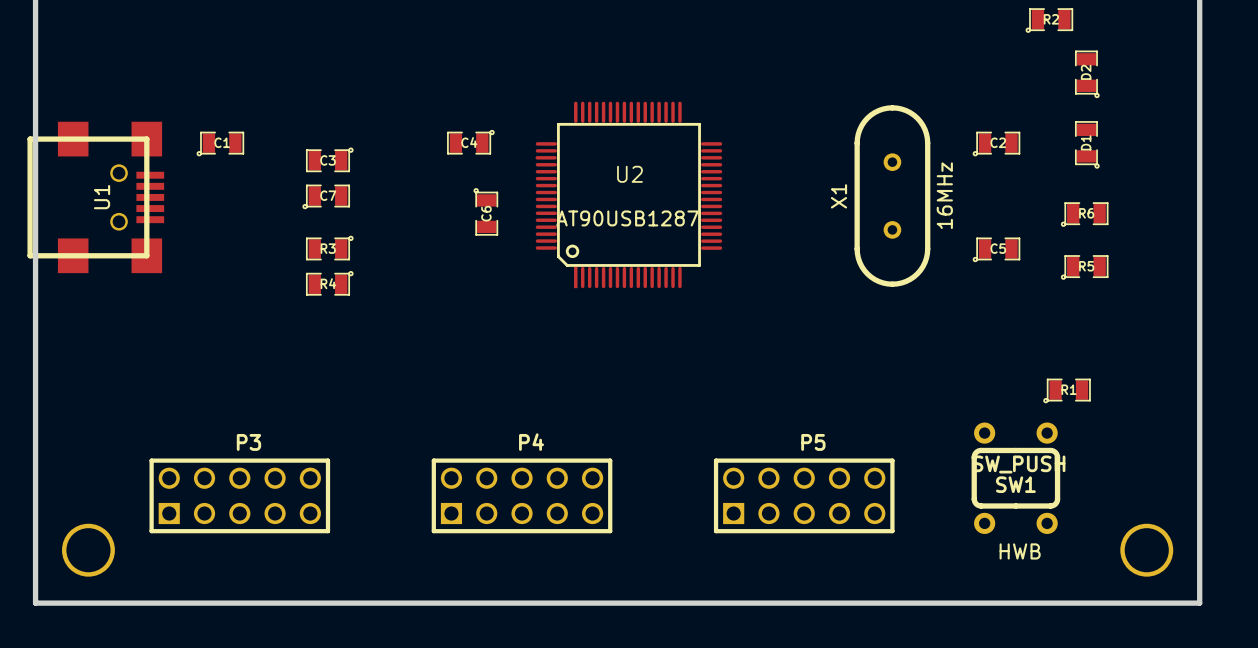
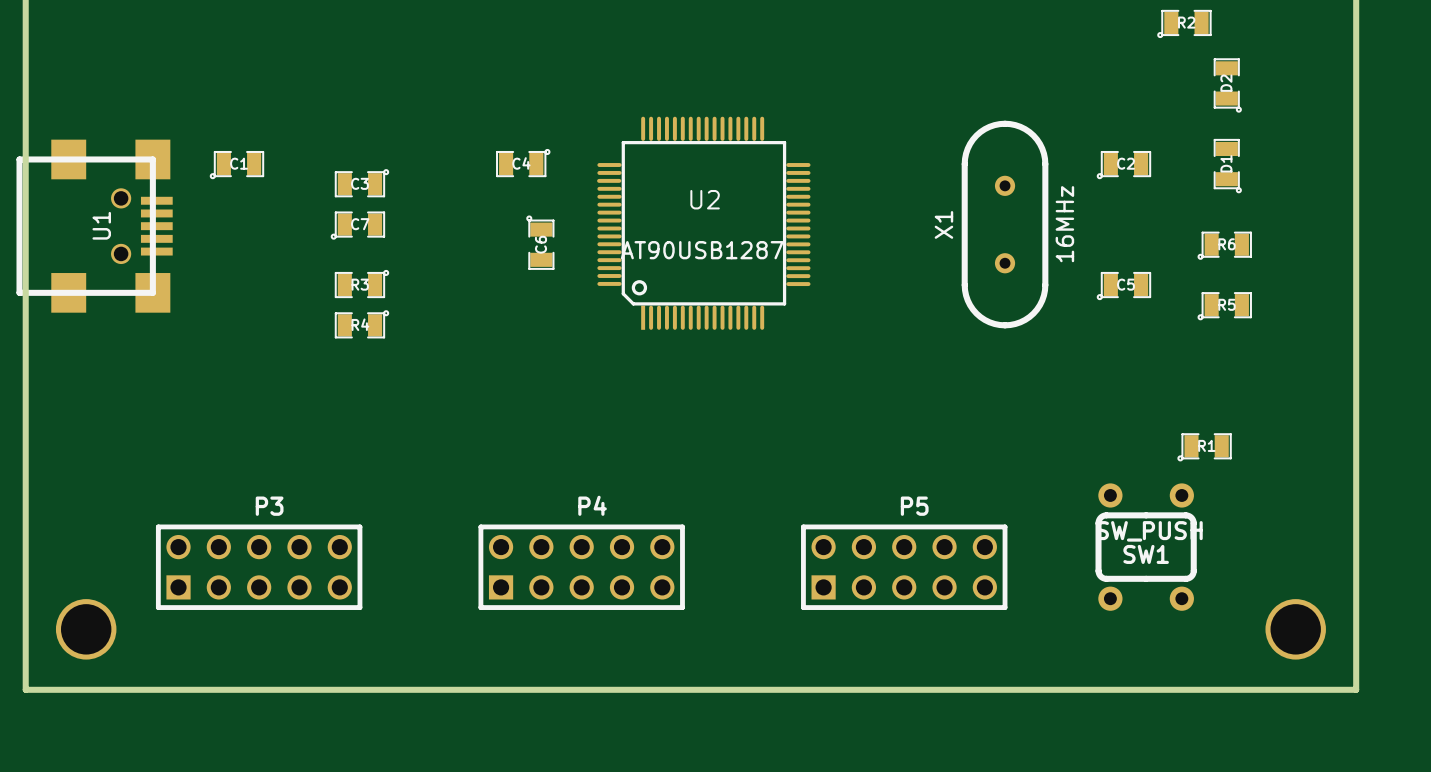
text: HWB (1020, 551) -> none

